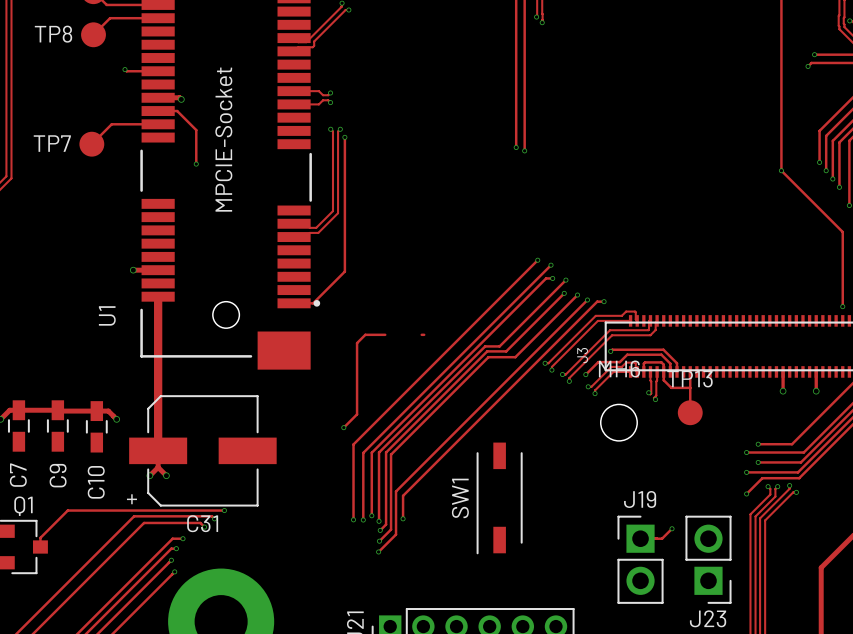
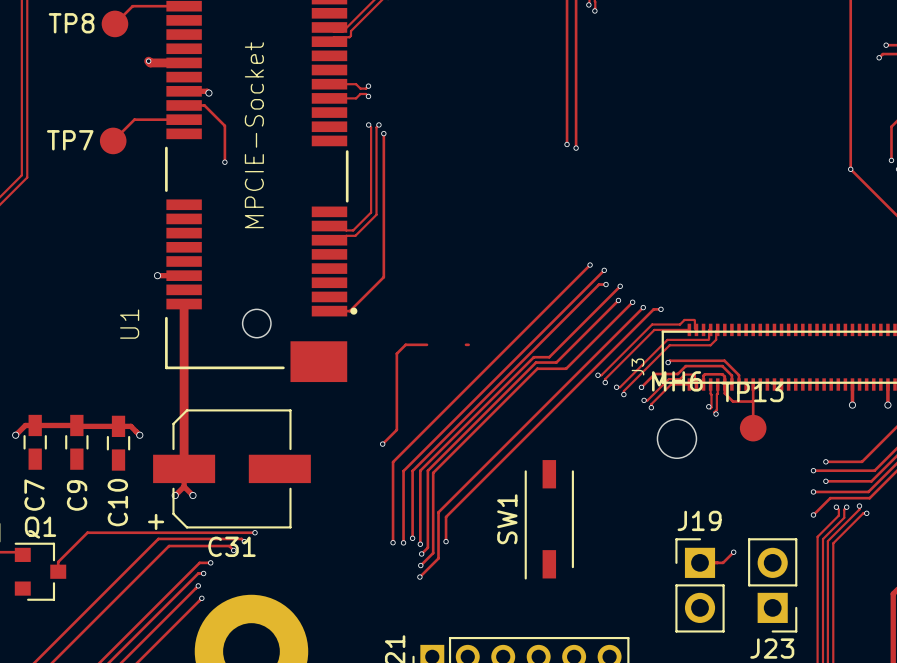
track width: thin (124, 69) (126, 71) (158, 71) -> thick (148, 61) (150, 62) (184, 62)

